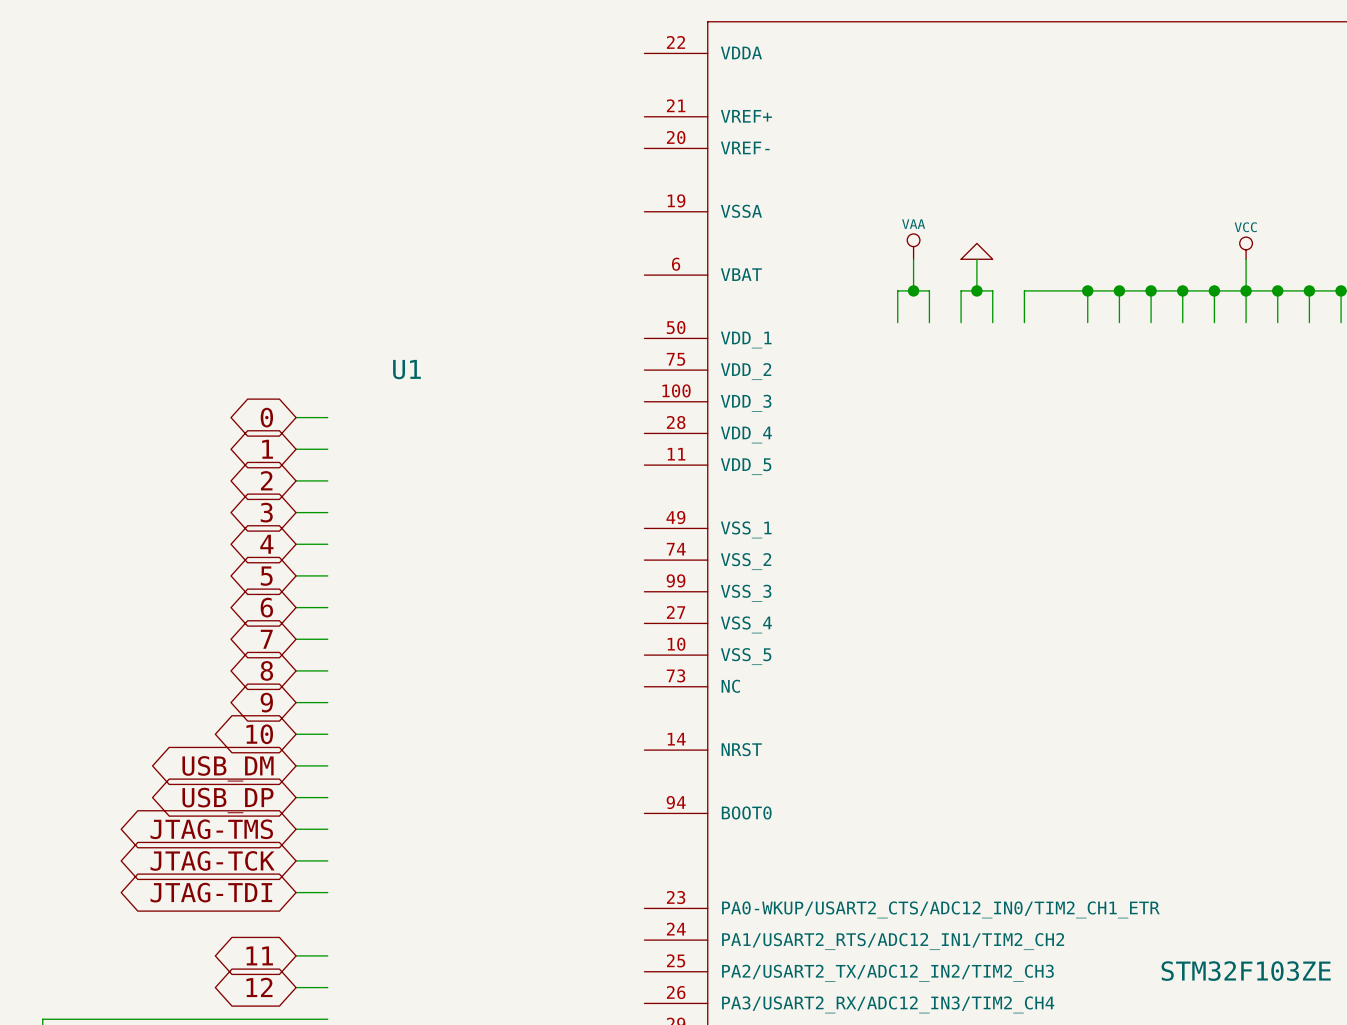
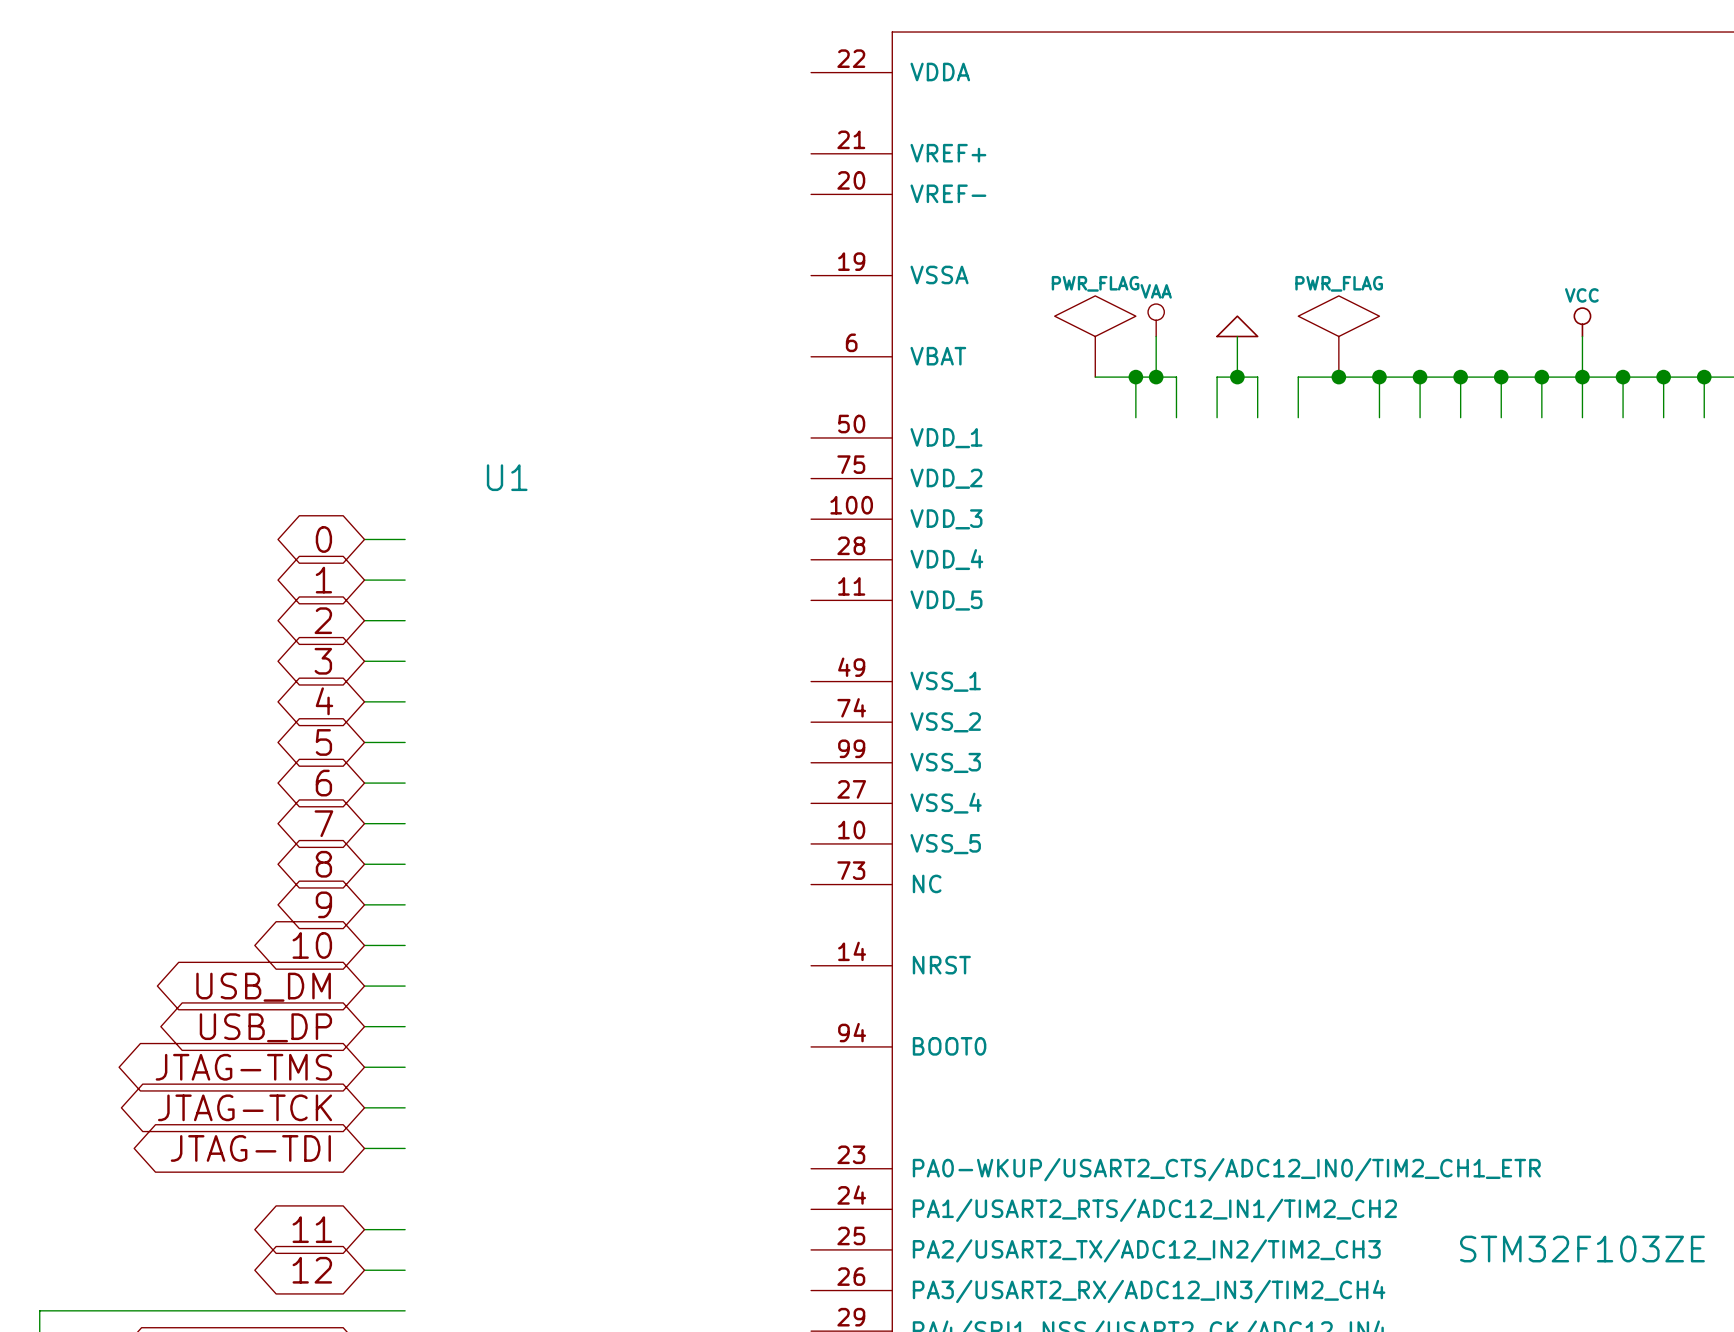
power symbol: none -> PWR_FLAG (1095, 336)
power symbol: none -> PWR_FLAG (1338, 336)
wire: none -> (1095, 377) (1135, 377)
junction: none -> (1135, 377)
junction: none -> (1338, 377)

